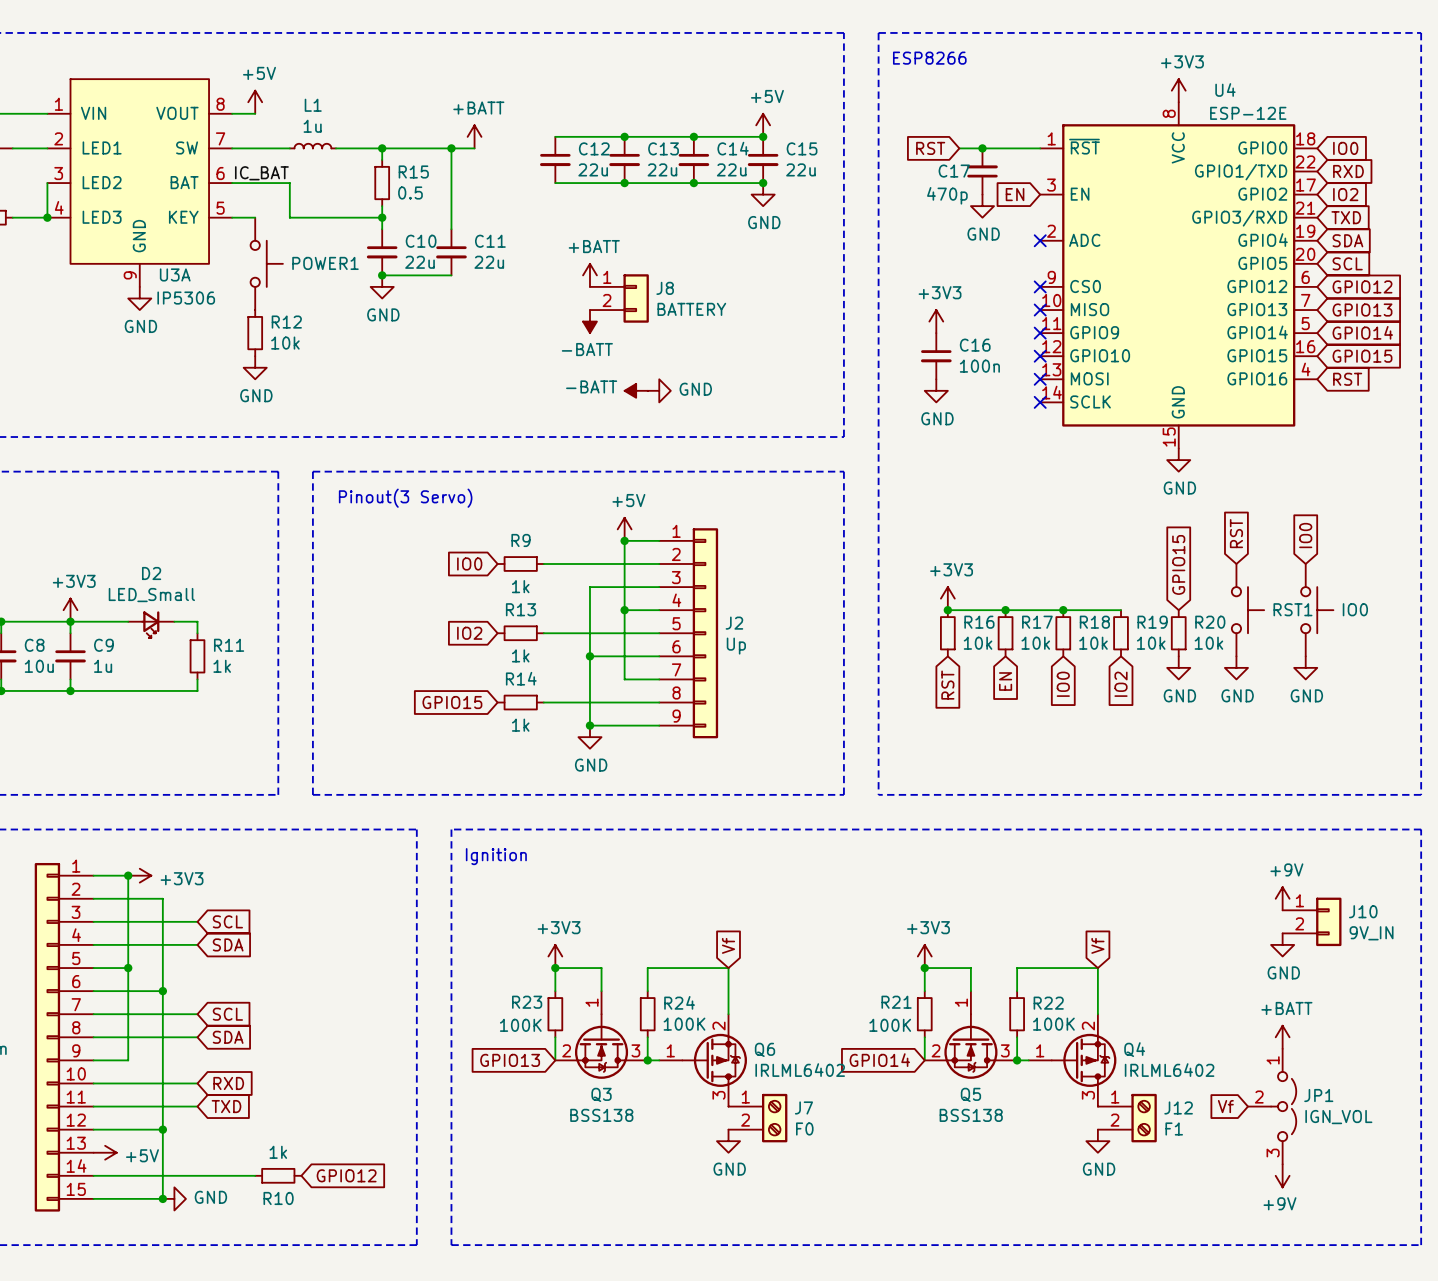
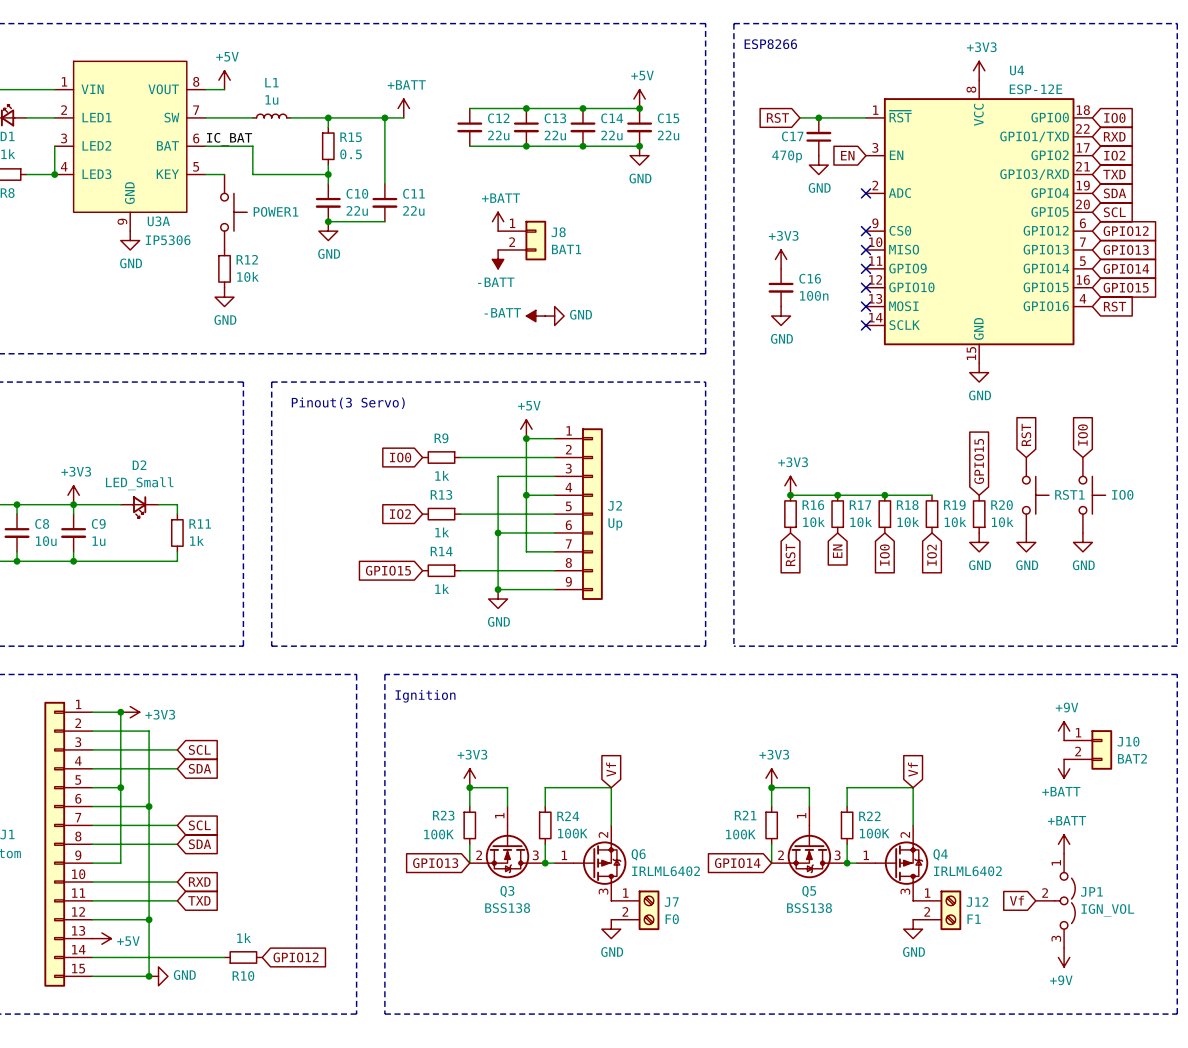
J8 value: BATTERY (691, 309) -> BAT1 (566, 249)
J10 value: 9V_IN (1371, 933) -> BAT2 (1132, 758)
power symbol: GND (1282, 944) -> +BATT (1064, 768)

